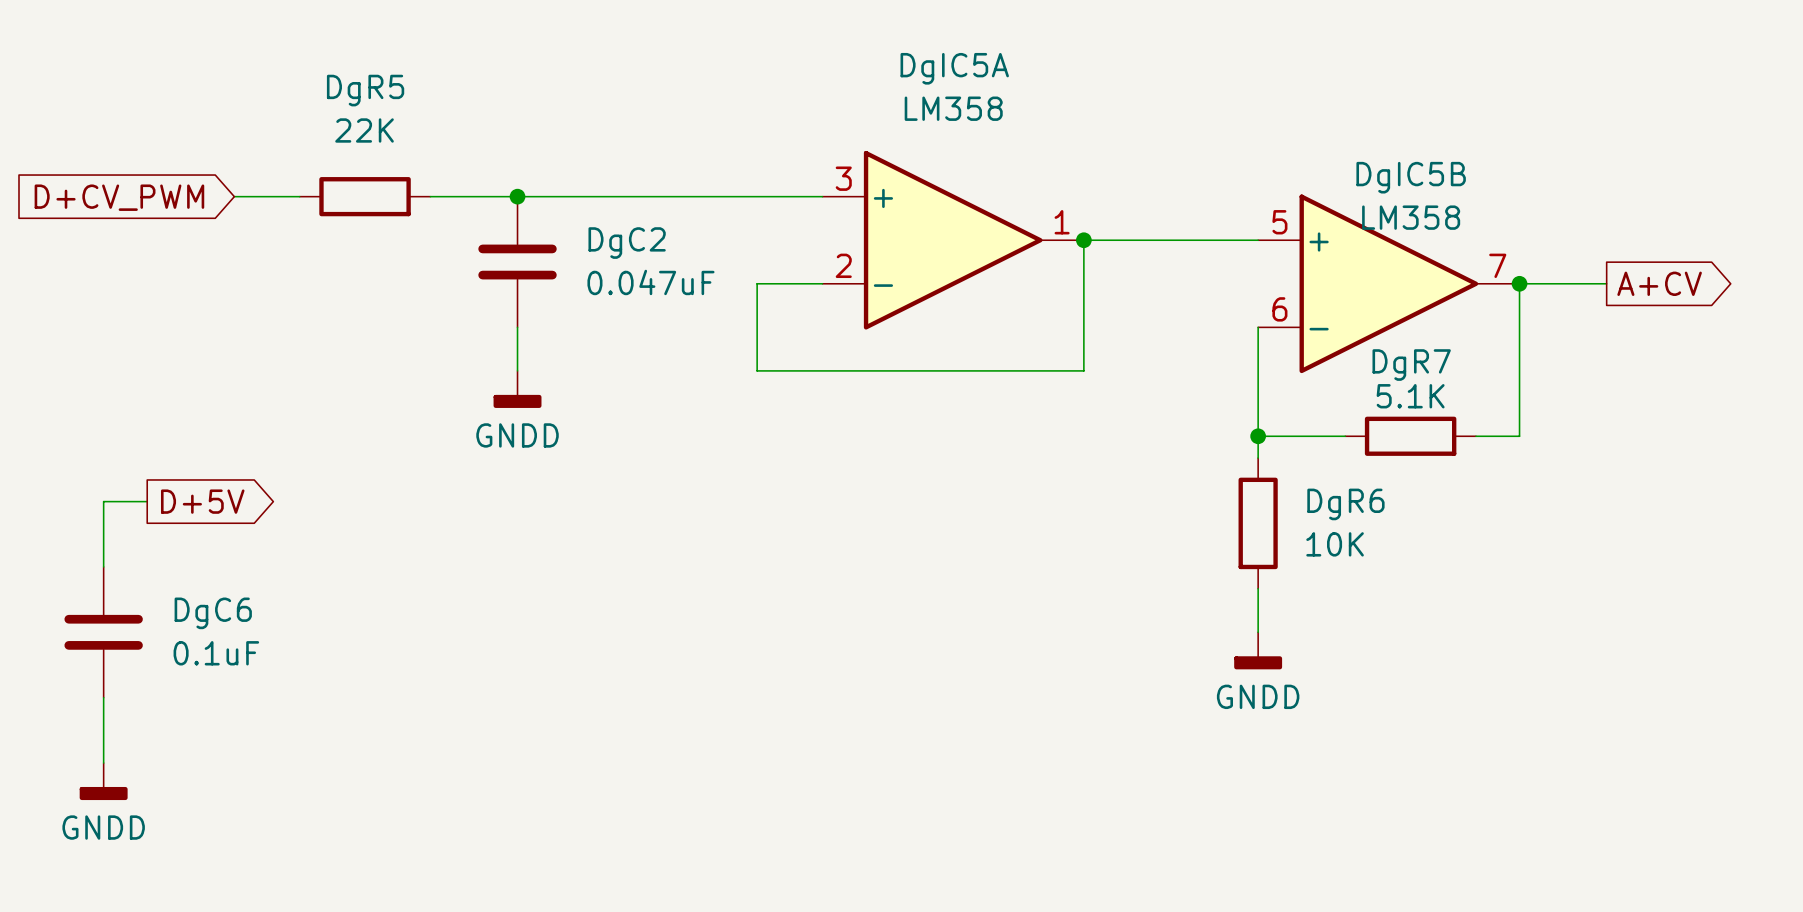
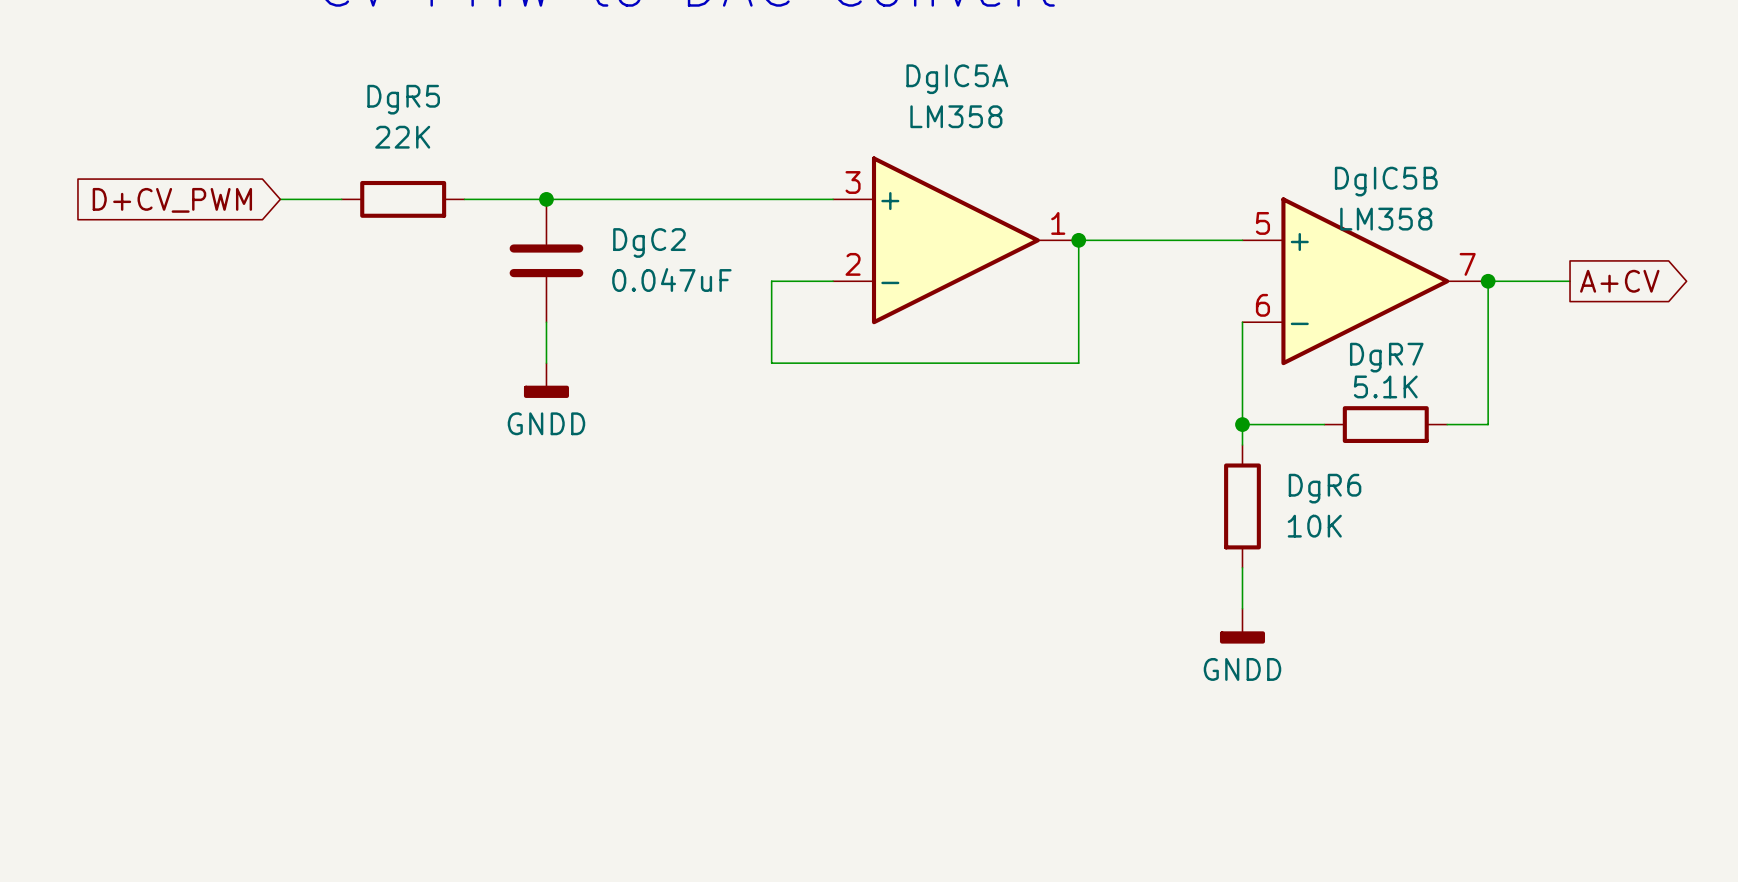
wire: (147, 501) (103, 501) (103, 566) -> none
global label: D+5V (202, 501) -> none
DgC6: 0.1uF (103, 632) -> none
wire: (103, 697) (103, 763) -> none
power symbol: GNDD (103, 781) -> none

